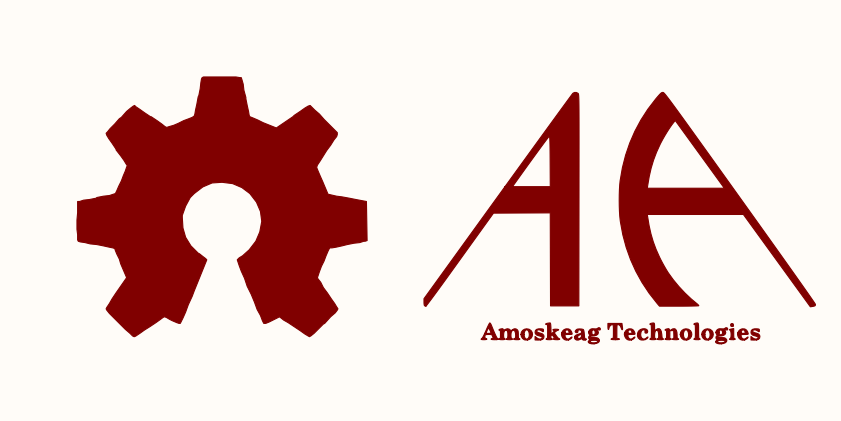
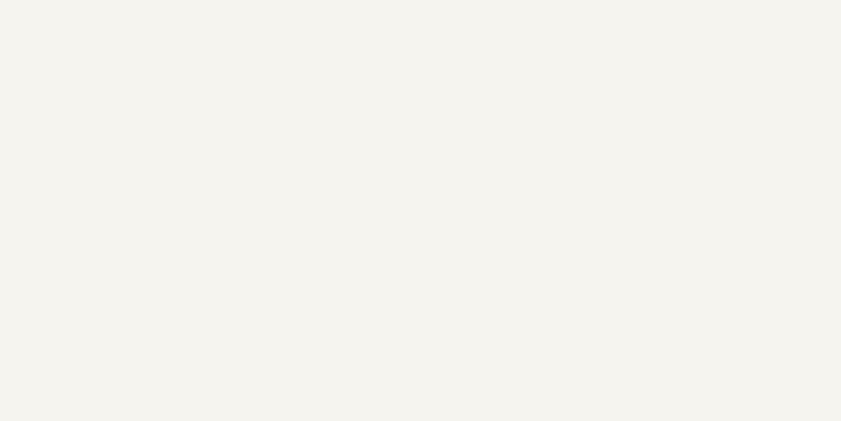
power symbol: (222, 206) -> none
power symbol: (619, 218) -> none

